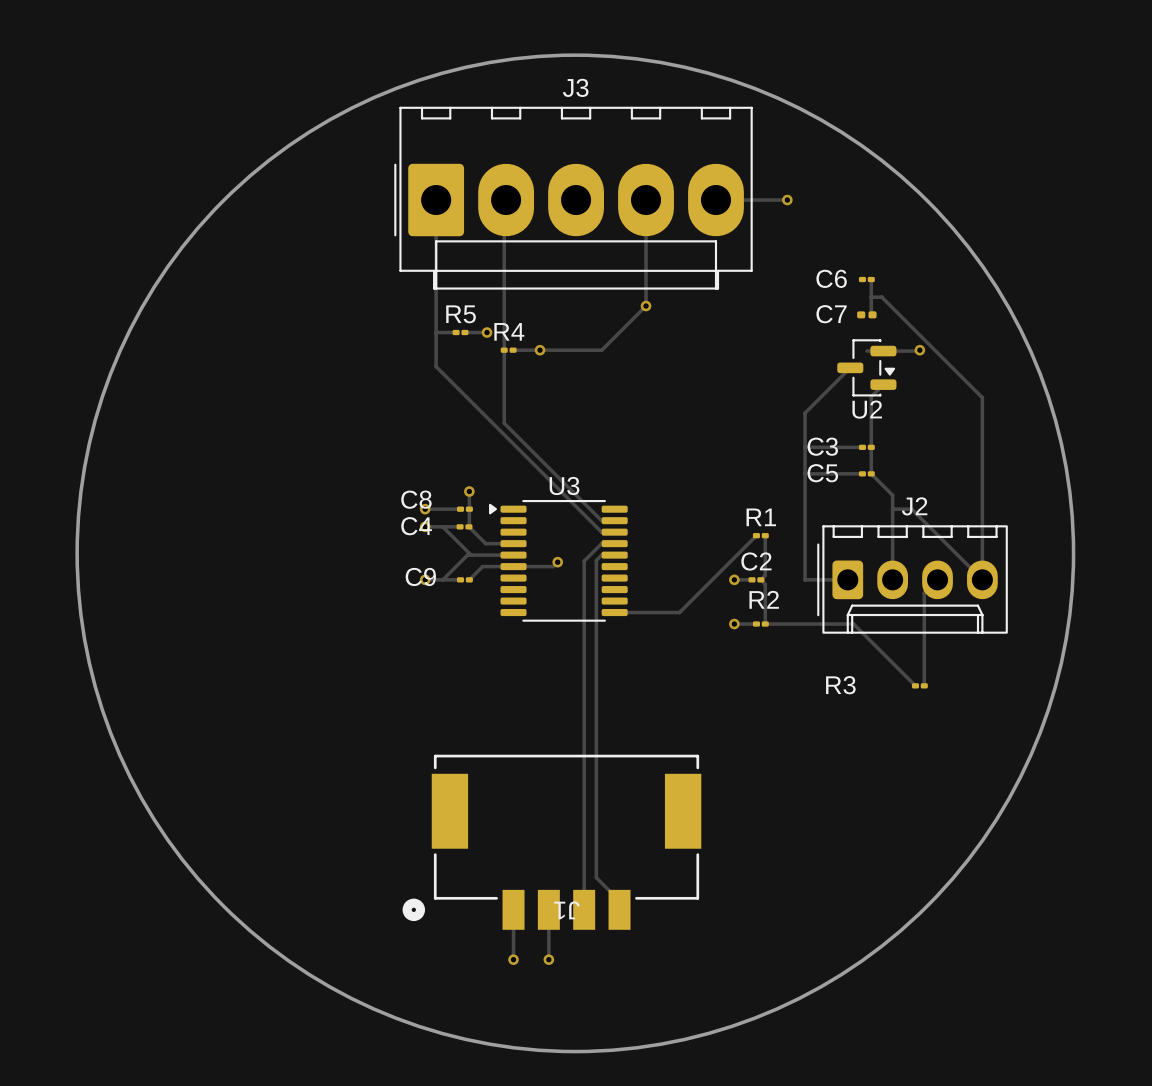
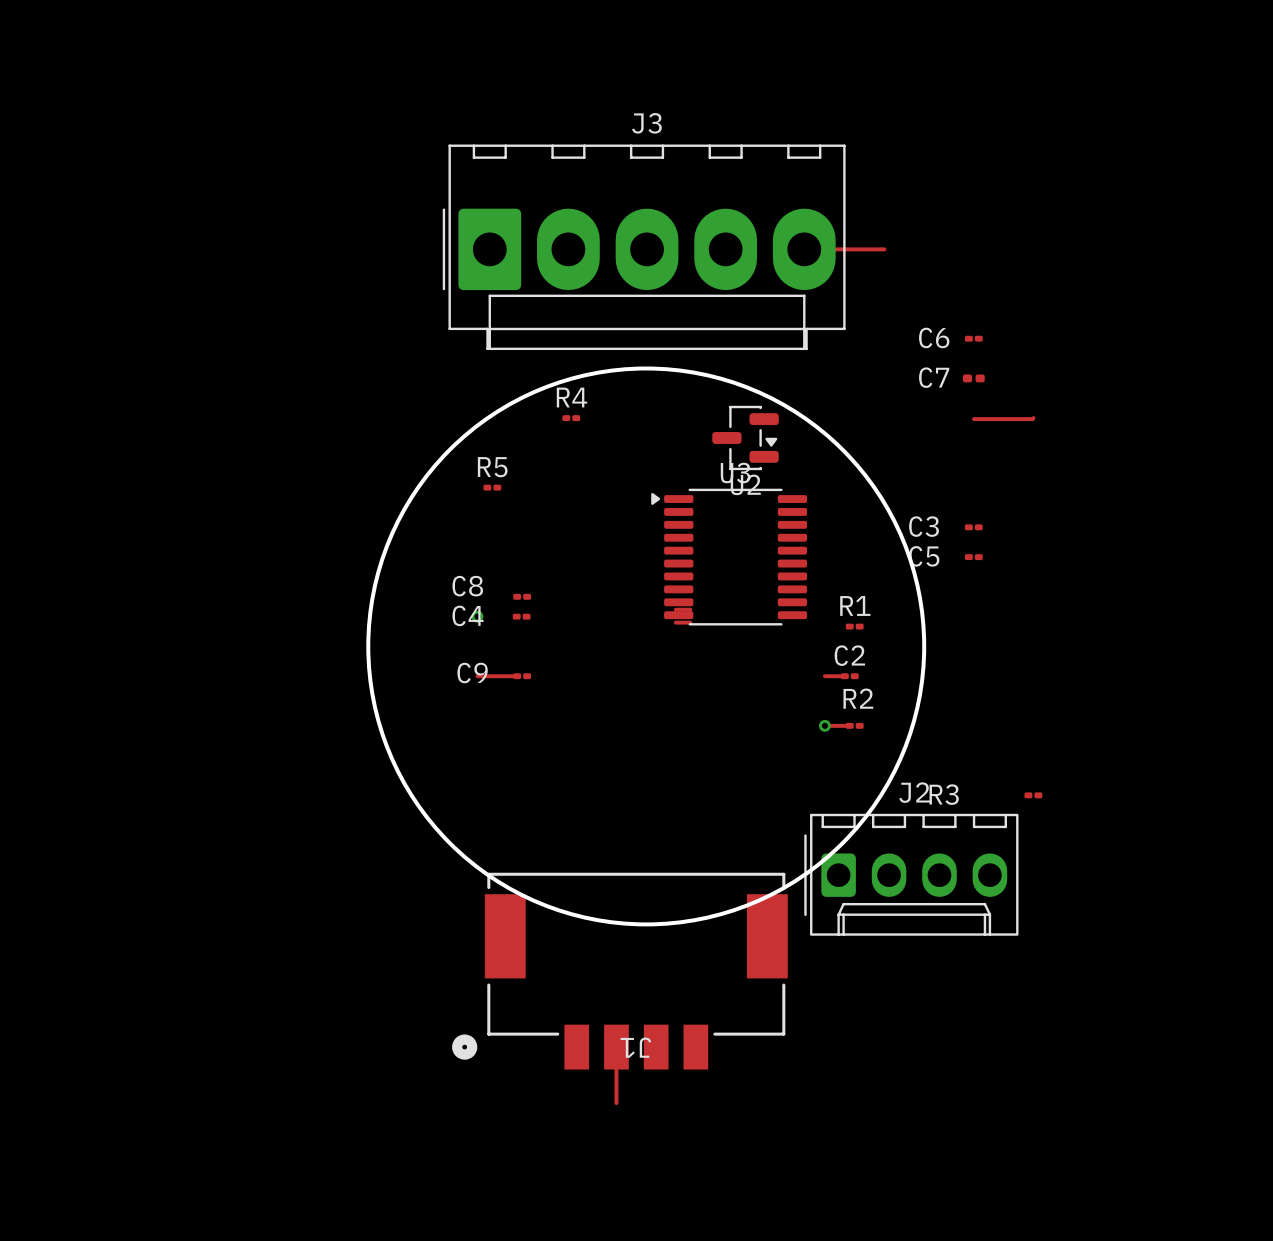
round board edge size: [75, 53, 1076, 1054] -> [366, 366, 927, 927]
track: (436, 200) (436, 366) (601, 532) -> none
track: (646, 200) (646, 306) (601, 350) (513, 350) -> none
via: (787, 200) -> none
track: (504, 201) (504, 423) (601, 520) -> none
track: (871, 279) (871, 313) -> none
track: (871, 297) (881, 297) (982, 397) (982, 579) (911, 509) (892, 509) -> none
via: (646, 306) -> none
track: (436, 332) (456, 332) -> none
R5 position: (460, 332) -> (492, 487)
track: (464, 332) (487, 332) -> none
via: (487, 332) -> none
via: (540, 350) -> none
via: (919, 350) -> none
track: (850, 367) (805, 413) (805, 579) (847, 579) -> none
U2 position: (866, 367) -> (745, 437)
track: (883, 384) (871, 396) (871, 473) (892, 495) (892, 579) -> none
track: (805, 447) (862, 447) -> none
track: (805, 473) (862, 473) -> none
track: (469, 491) (469, 526) -> none
via: (469, 491) -> none
track: (425, 509) (460, 509) -> none
via: (425, 509) -> none
track: (425, 526) (460, 526) -> none
track: (442, 526) (471, 555) -> none
track: (468, 526) (485, 543) (513, 543) -> none
track: (756, 535) (679, 612) (614, 612) -> none
track: (765, 535) (765, 575) (760, 579) (765, 584) (765, 624) (853, 624) (915, 685) -> none
track: (614, 543) (601, 543) (584, 561) (584, 909) -> none
track: (513, 555) (467, 555) (442, 579) -> none
track: (614, 555) (601, 555) (596, 560) (596, 877) (619, 900) (619, 909) -> none
U3 position: (558, 560) -> (729, 557)
track: (557, 562) (553, 566) (482, 566) (469, 579) -> none
via: (557, 562) -> none
via: (425, 579) -> none
via: (734, 579) -> none
J2 position: (912, 579) -> (911, 874)
track: (937, 579) (924, 593) (924, 685) -> none
track: (513, 909) (513, 959) -> none
via: (513, 959) -> none
via: (548, 959) -> none

